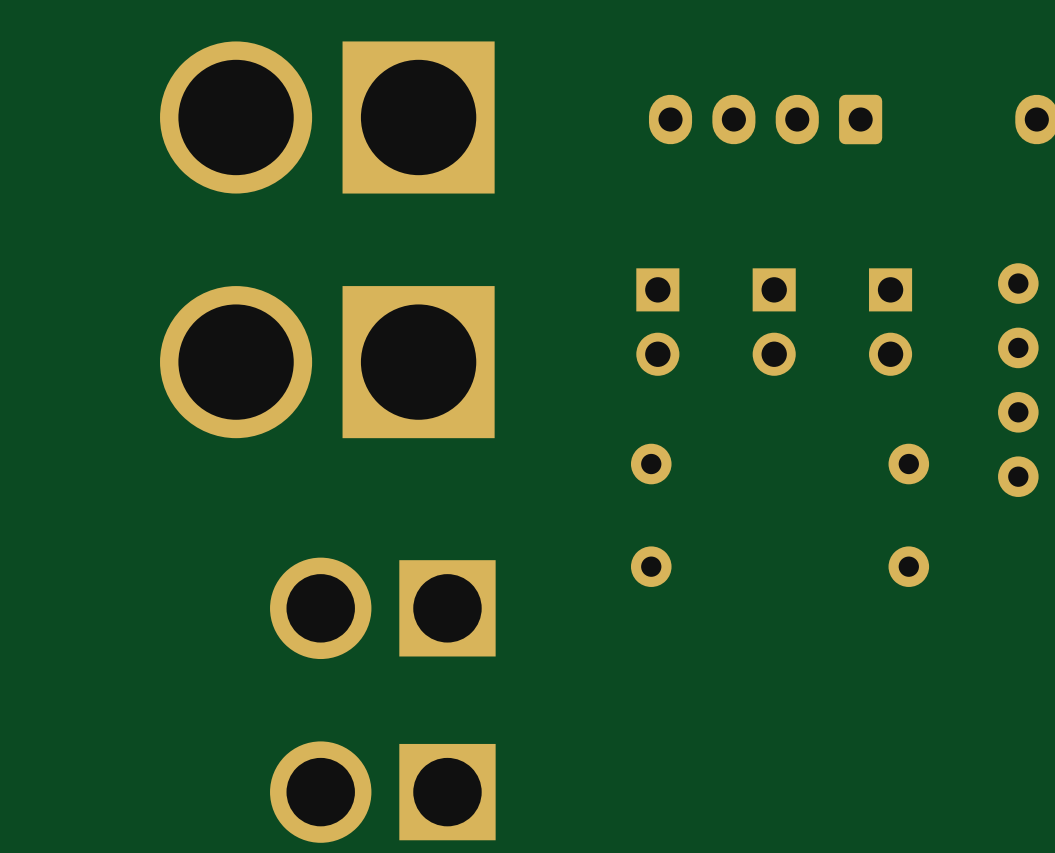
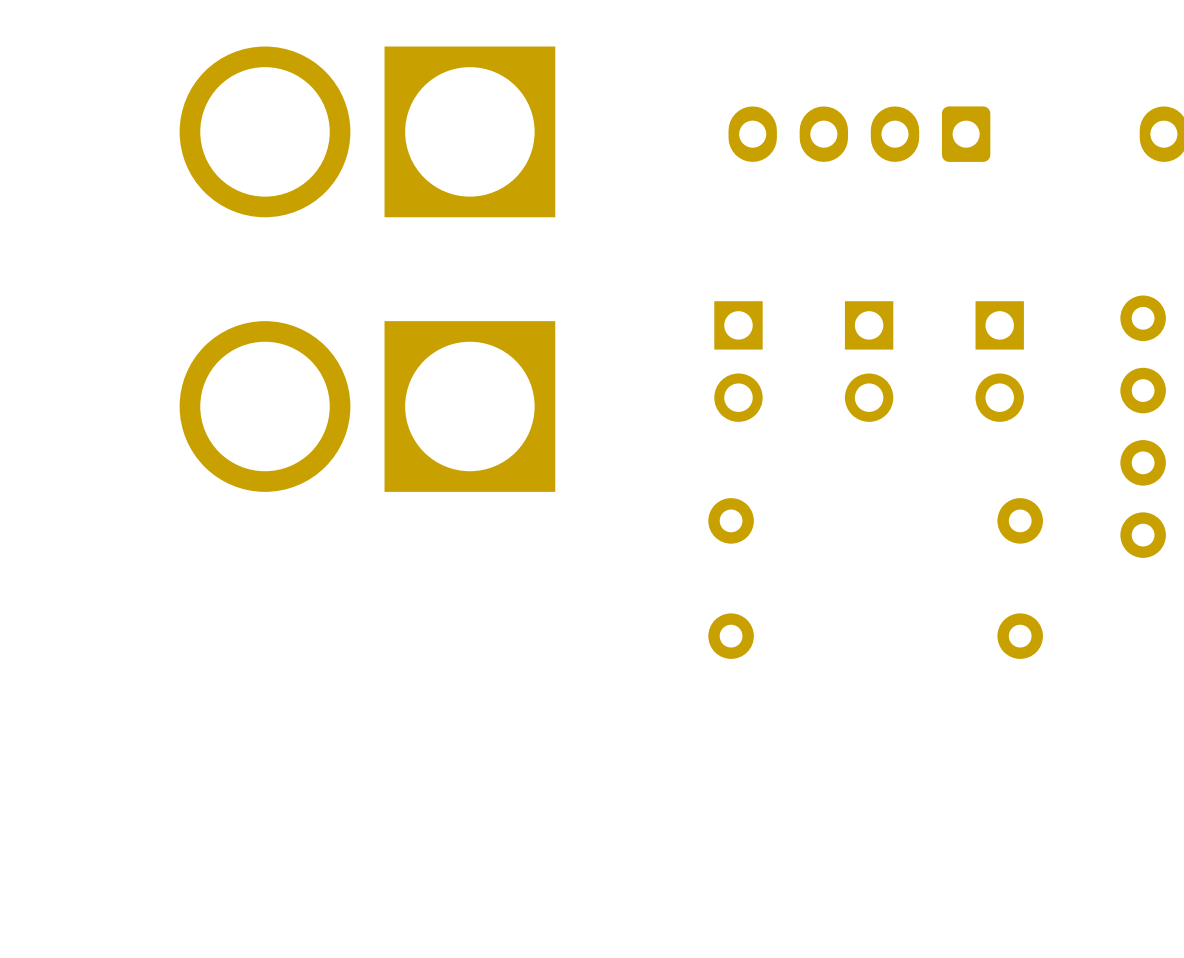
part: (382, 608) -> none
part: (382, 792) -> none

